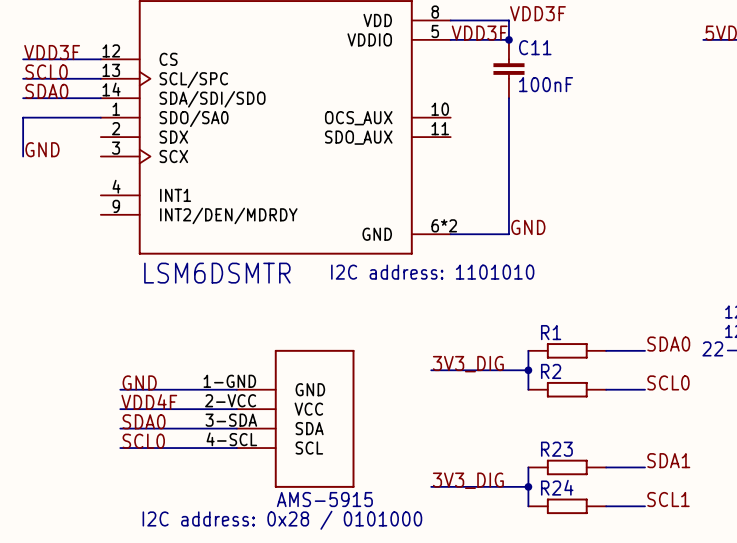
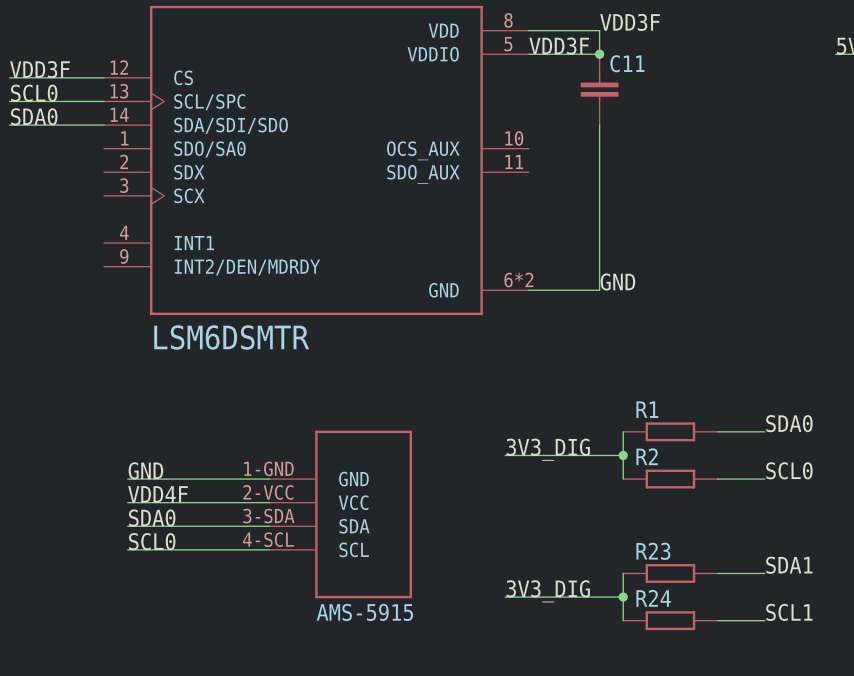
C11 value: 100nF (546, 84) -> none
wire: (100, 117) (23, 117) (23, 156) -> none
label: GND (42, 149) -> none
text: I2C address: 1101010 (432, 272) -> none
text: I2C address: 0x28 / 0101000 (282, 520) -> none

